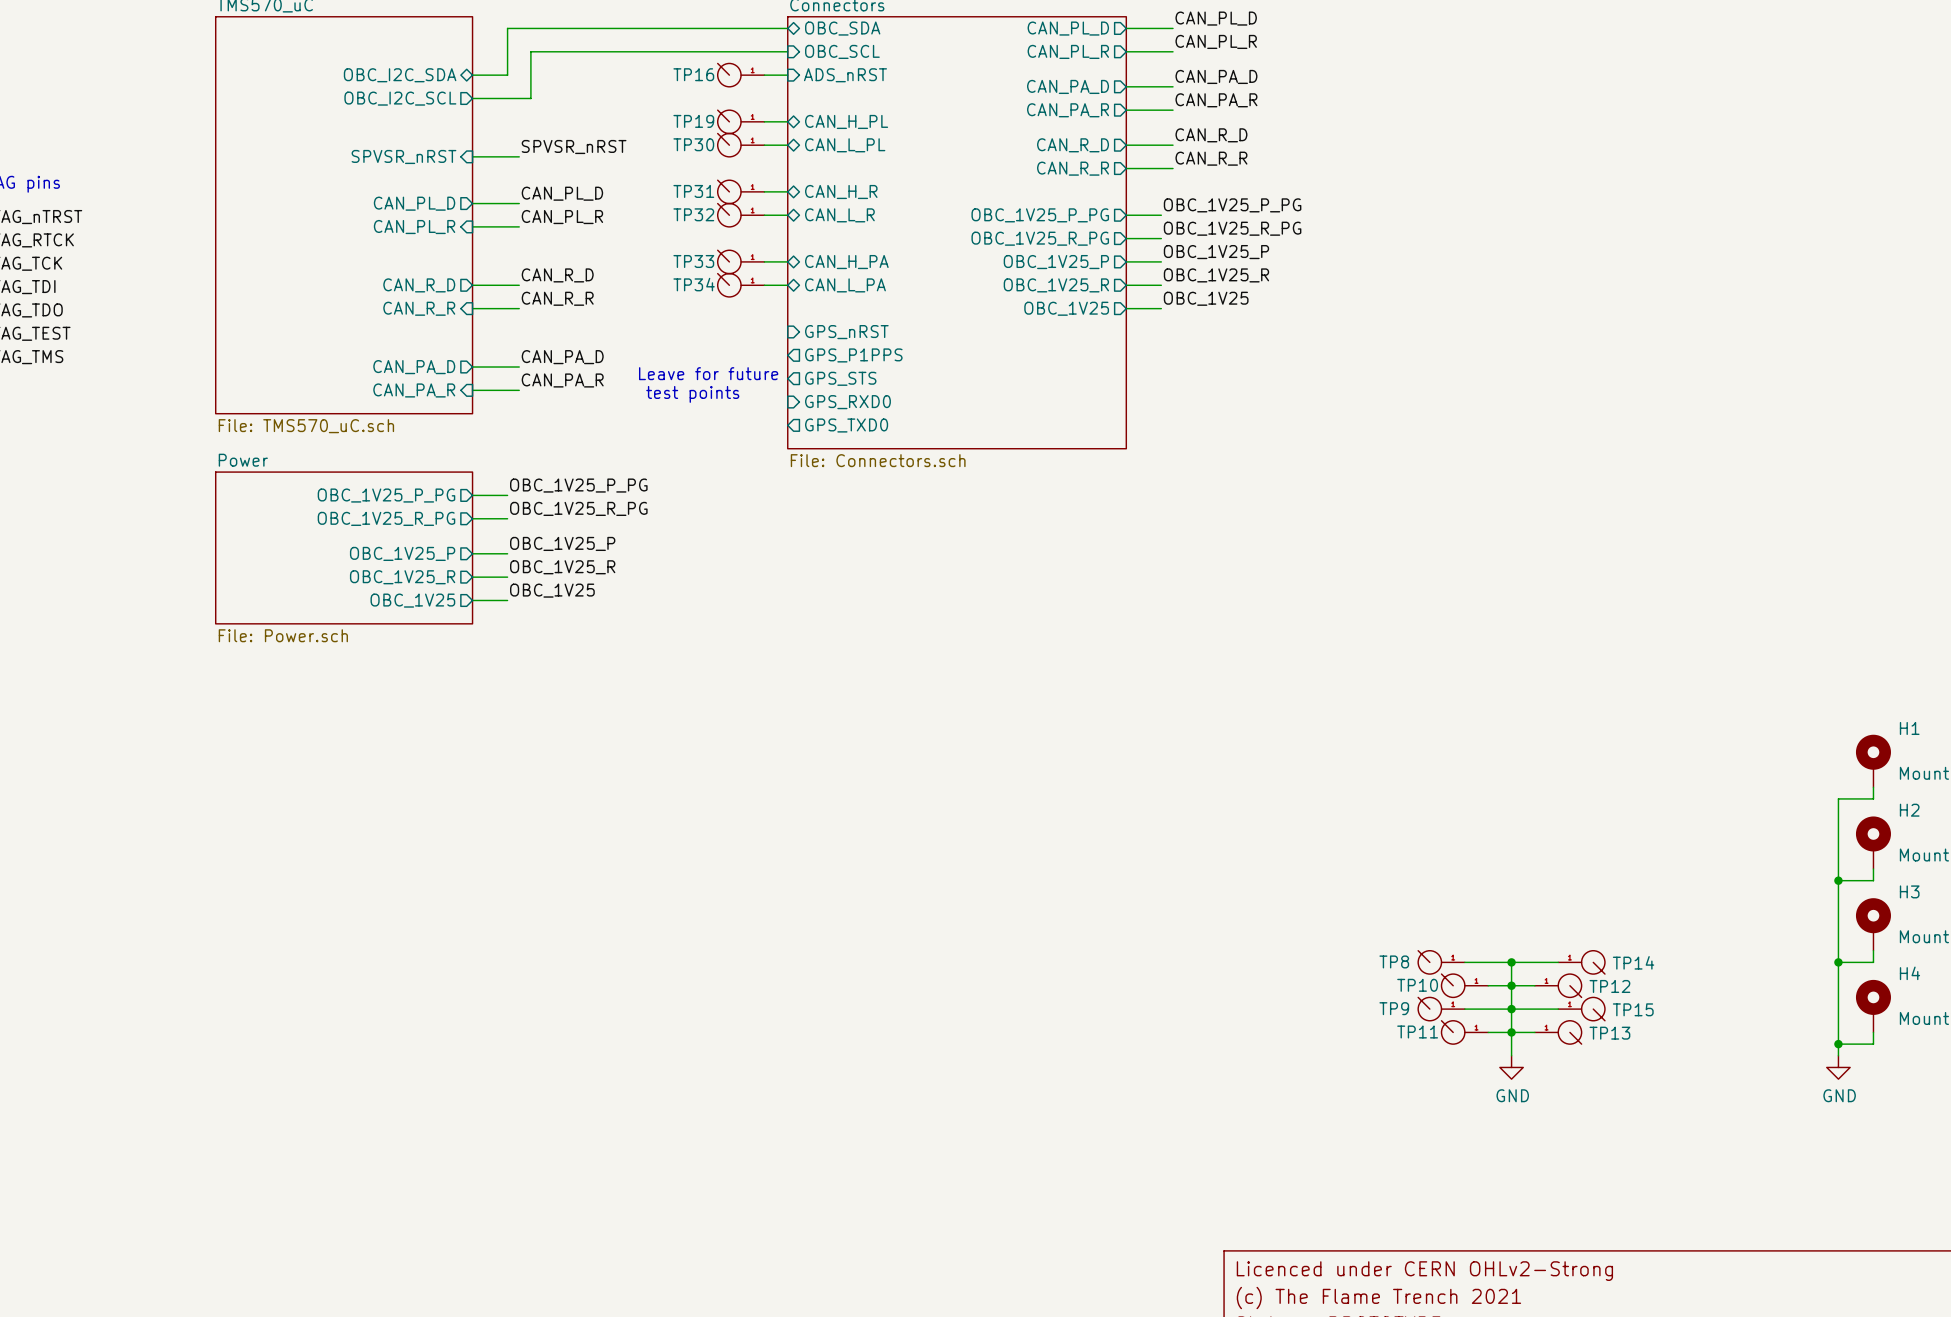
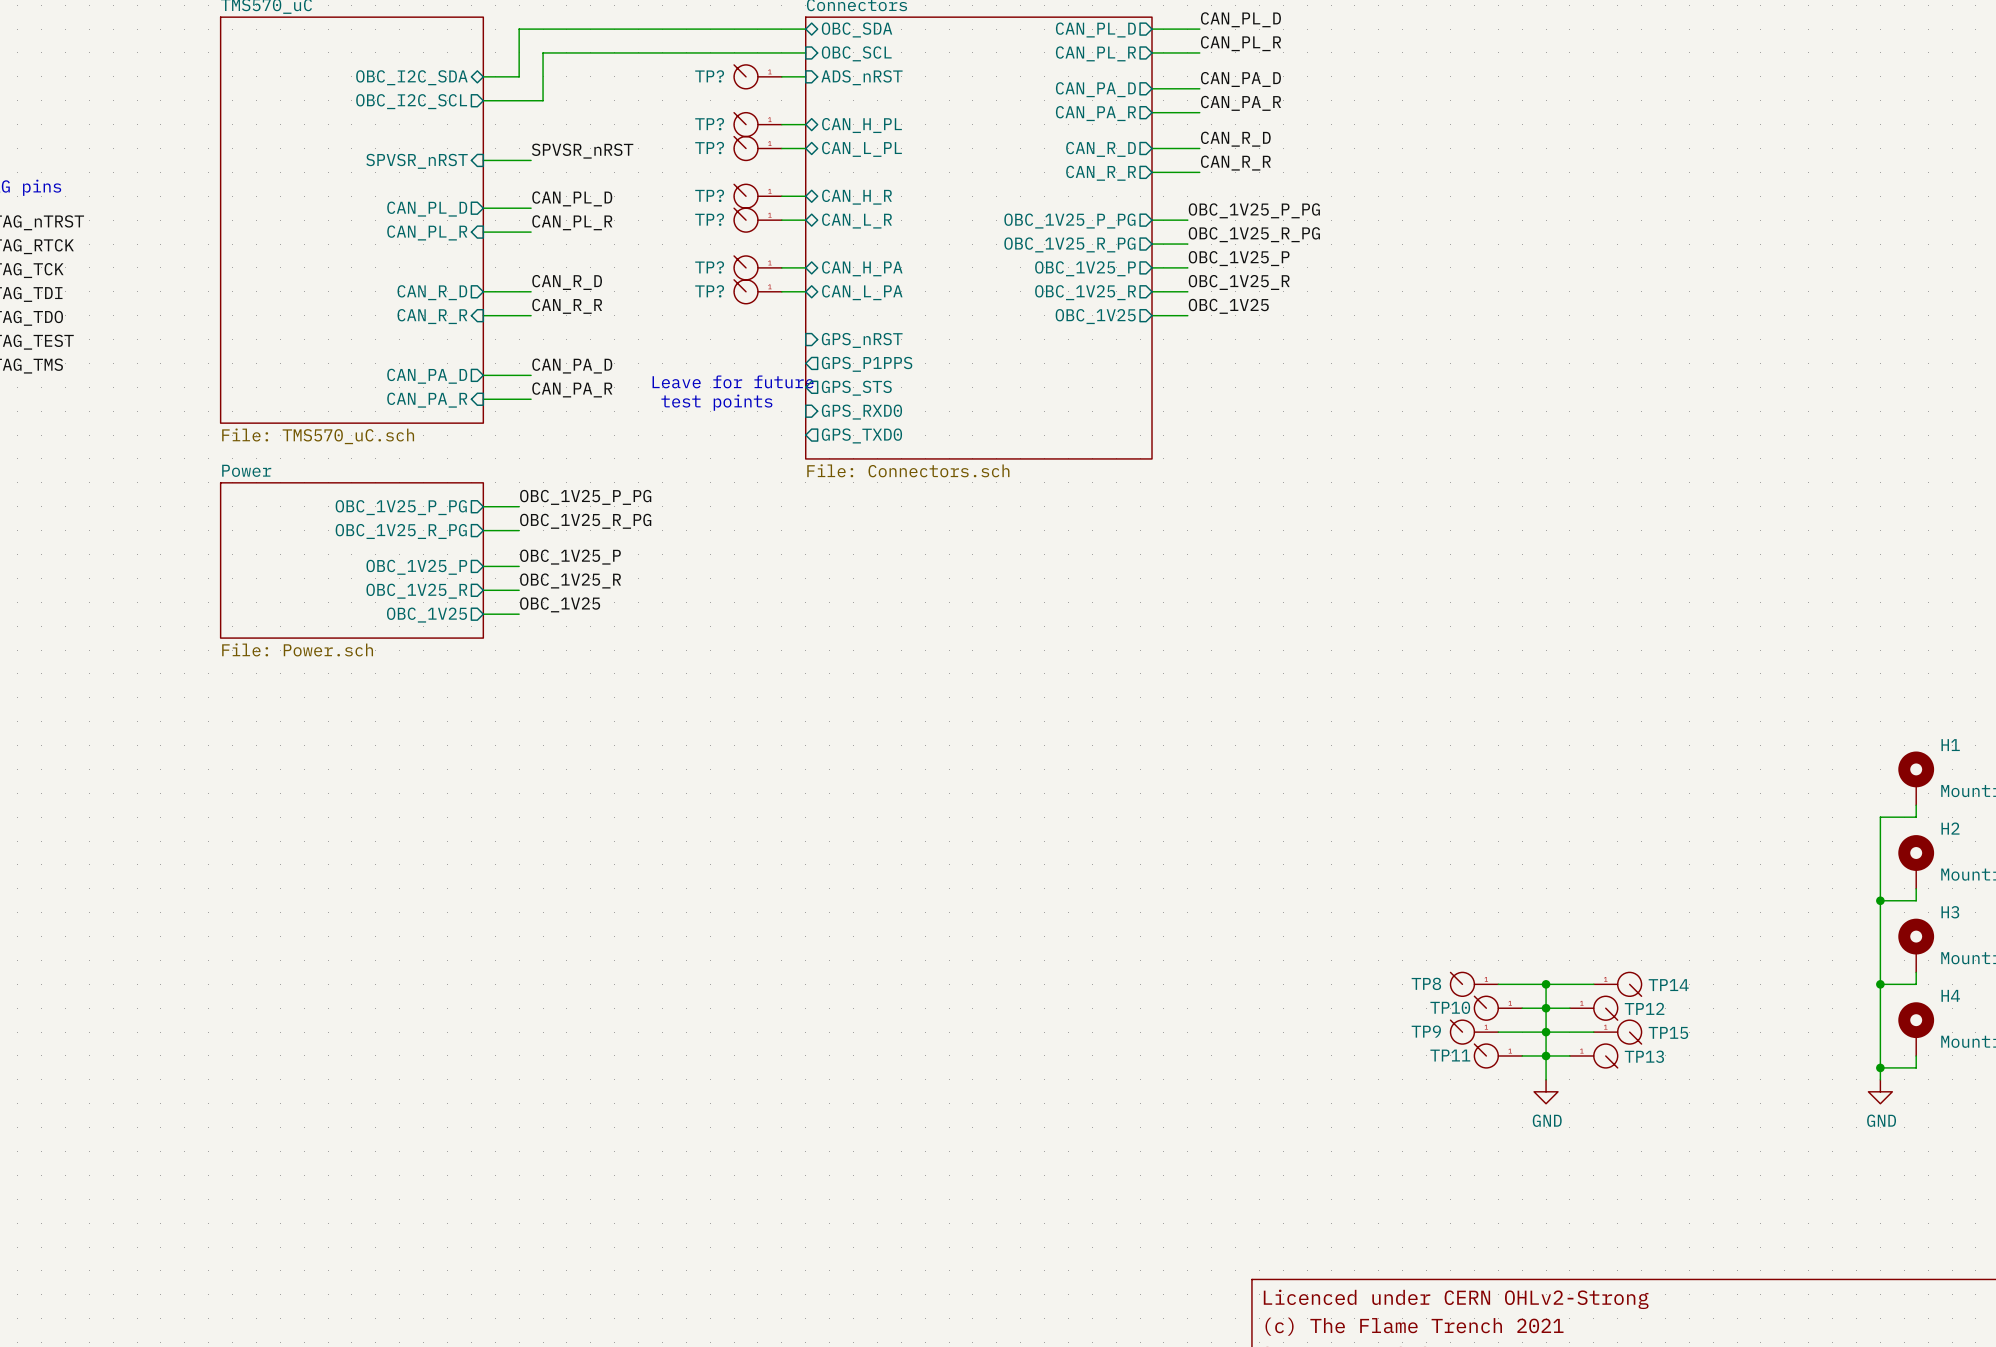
TP16 name: TP16 (693, 74) -> TP? (709, 76)
TP19 name: TP19 (693, 121) -> TP? (709, 124)
TP30 name: TP30 (693, 144) -> TP? (709, 148)
TP31 name: TP31 (693, 191) -> TP? (709, 195)
TP32 name: TP32 (693, 214) -> TP? (709, 219)
TP33 name: TP33 (693, 261) -> TP? (709, 267)
TP34 name: TP34 (694, 284) -> TP? (709, 291)

